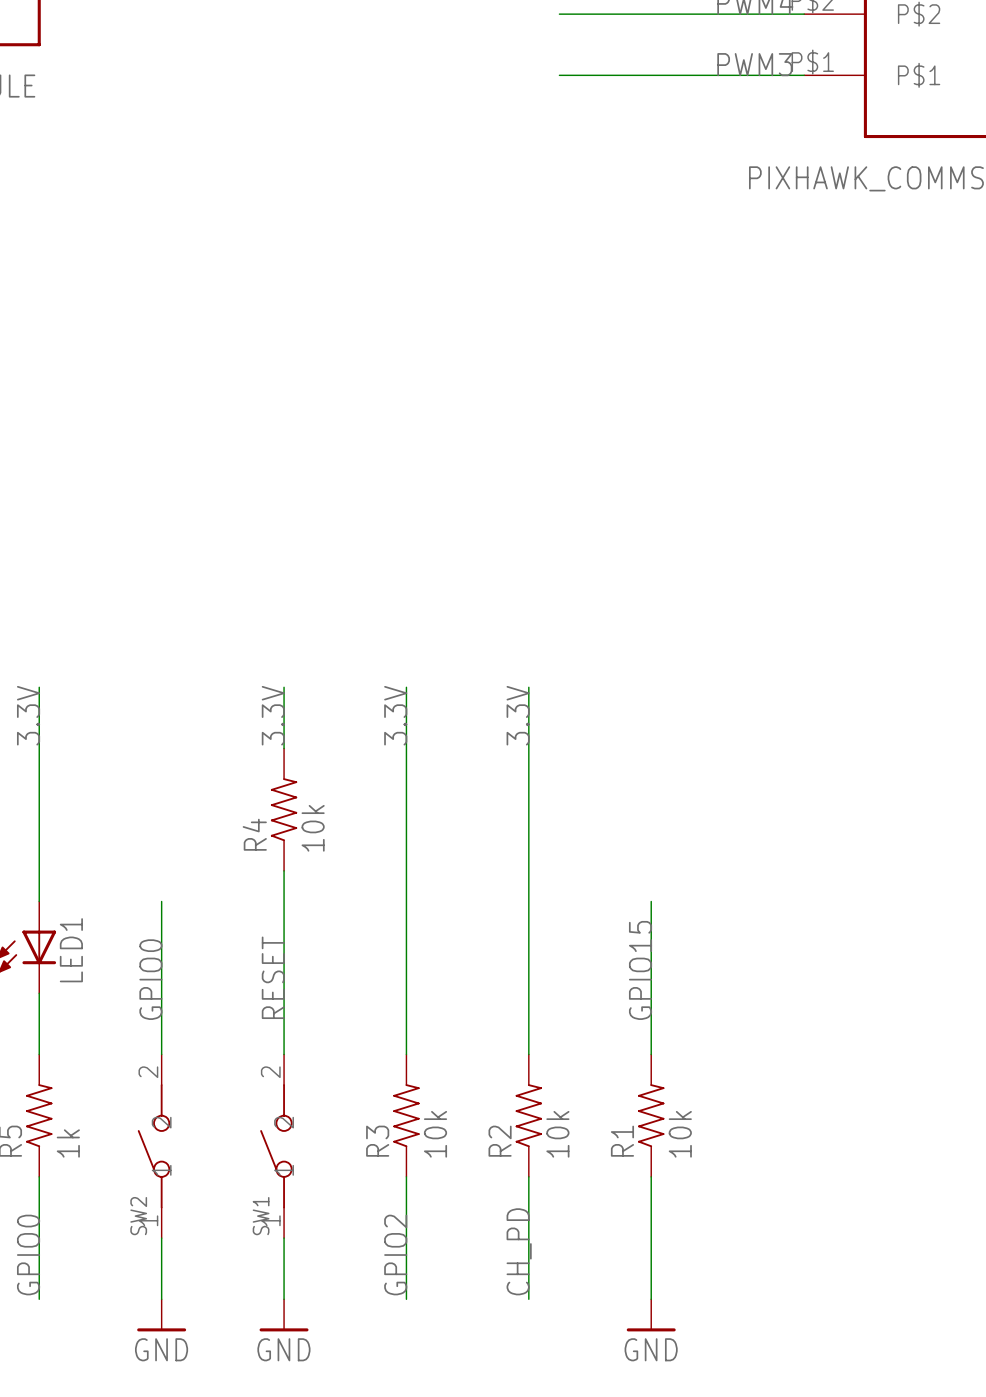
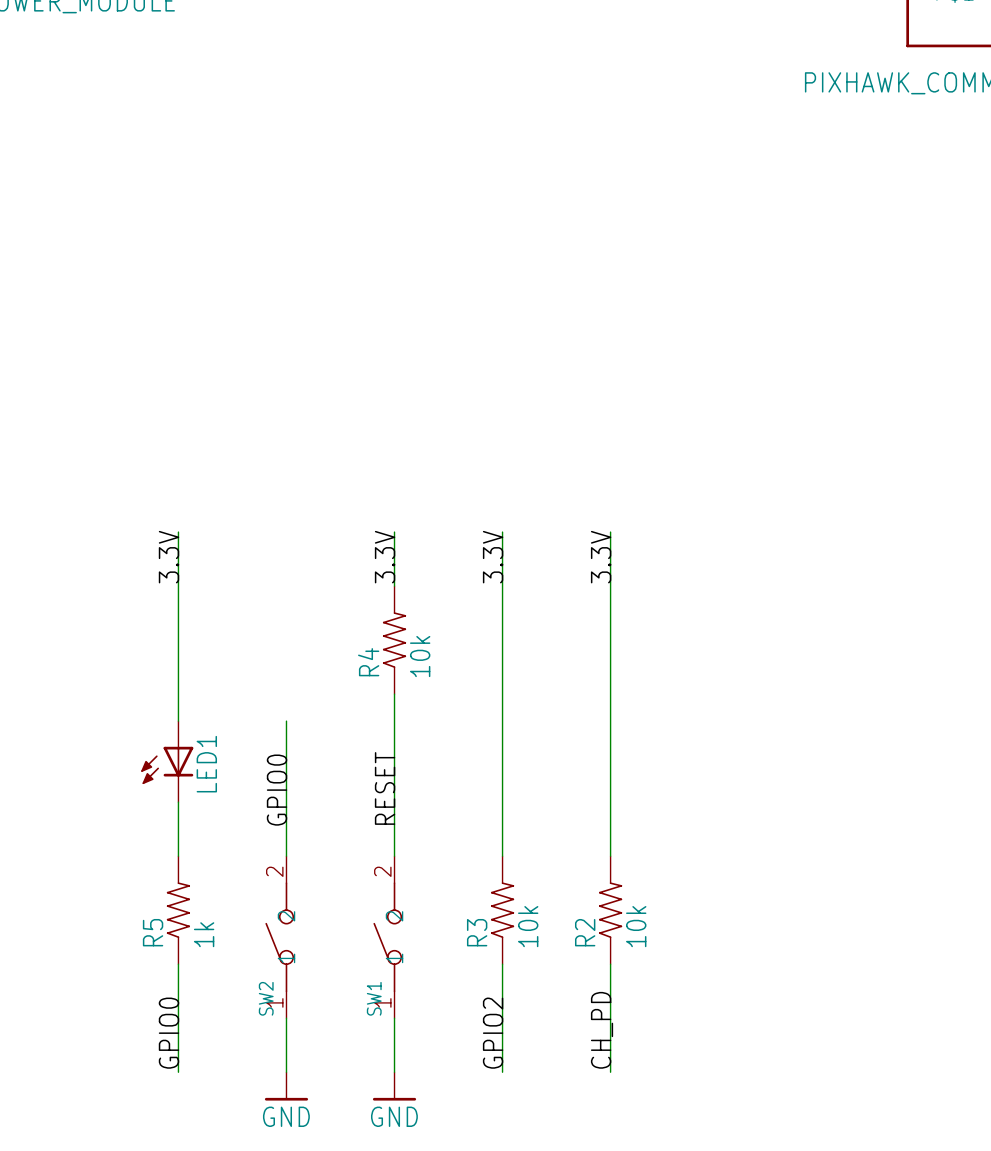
wire: (651, 901) (651, 1054) -> none
label: GPIO15 (640, 970) -> none
R1: 10k (651, 1115) -> none
wire: (651, 1176) (651, 1299) -> none
power symbol: GND (651, 1315) -> none

